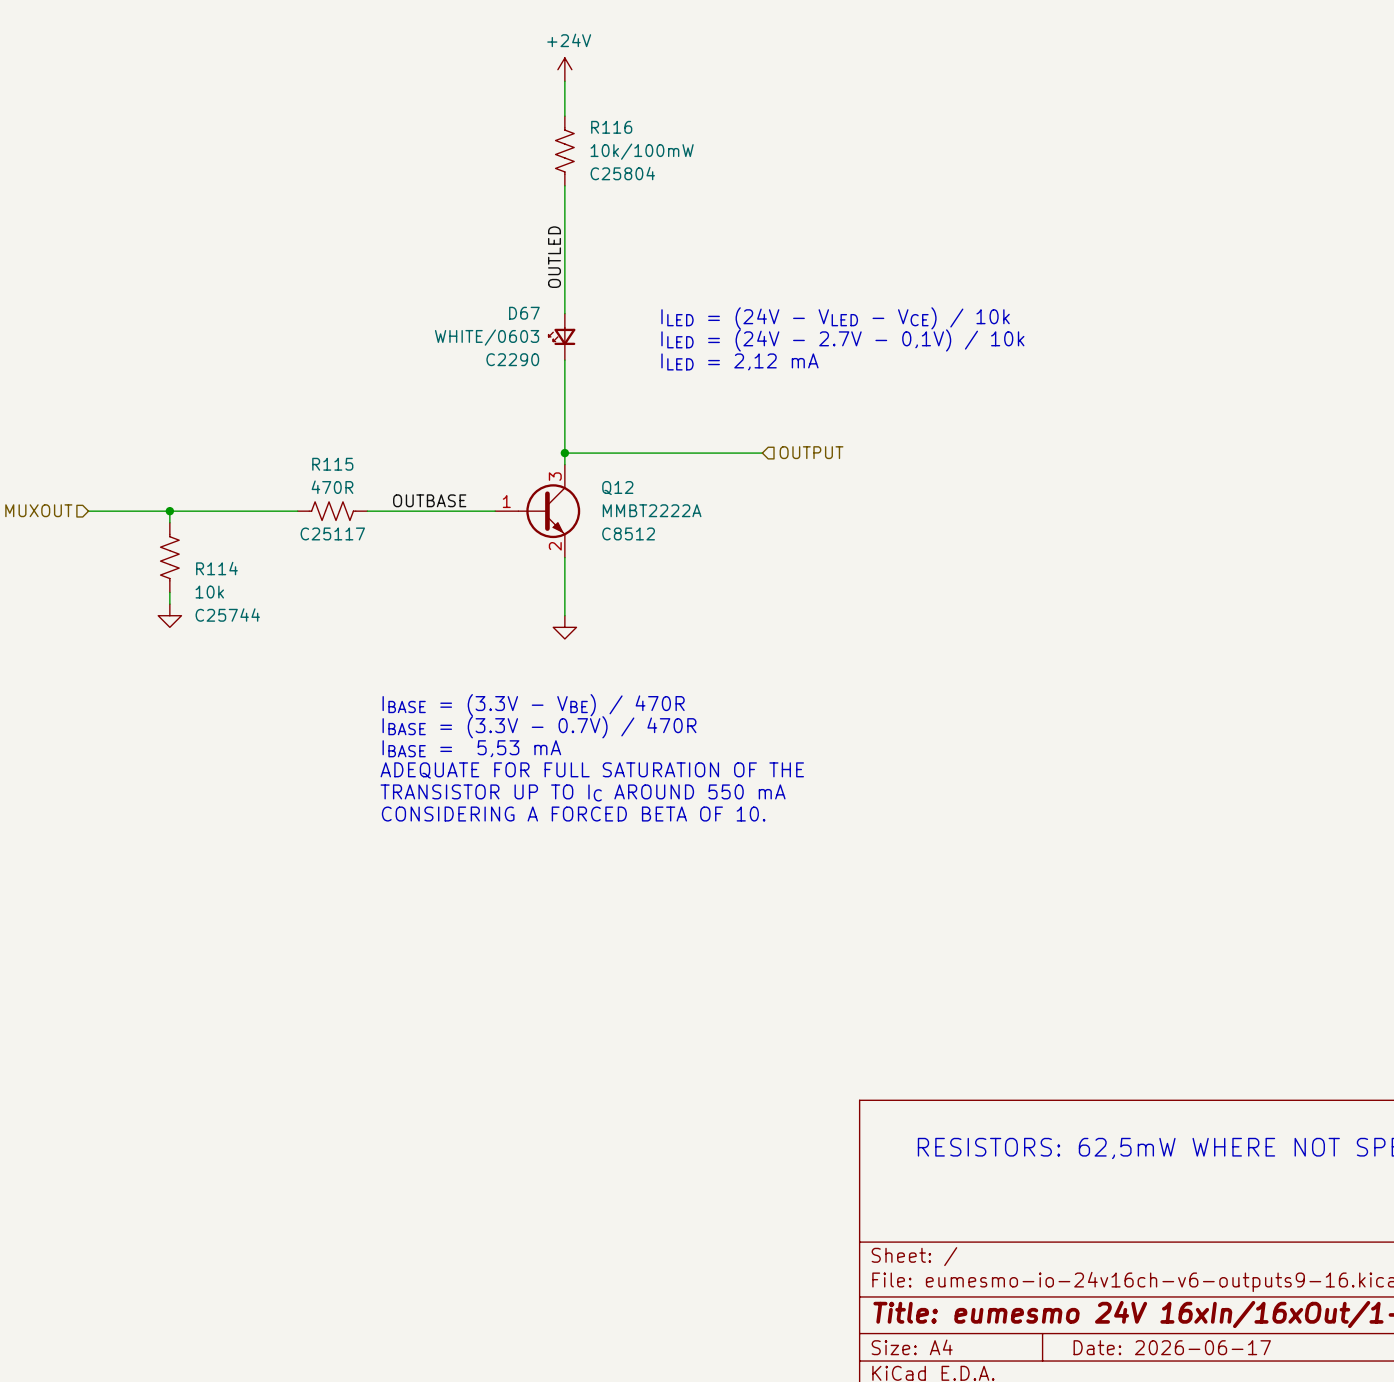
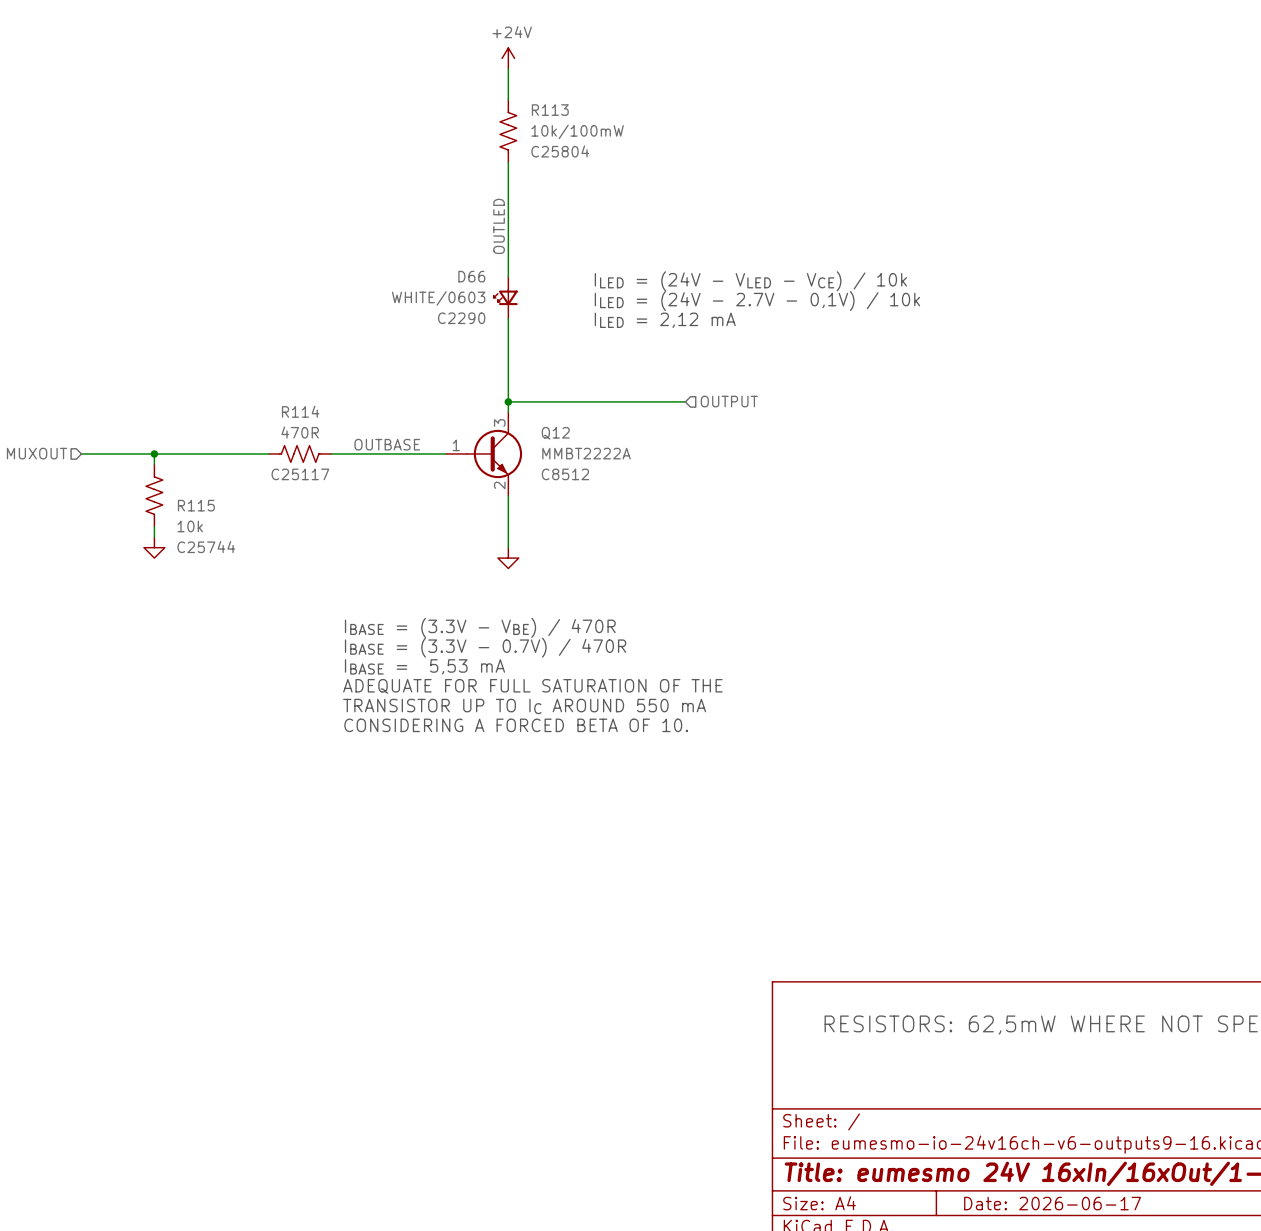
R116 name: R116 (611, 127) -> R113 (550, 110)
D67 name: D67 (524, 313) -> D66 (471, 276)
R115 name: R115 (332, 464) -> R114 (300, 411)
R114 name: R114 (216, 568) -> R115 (196, 505)

